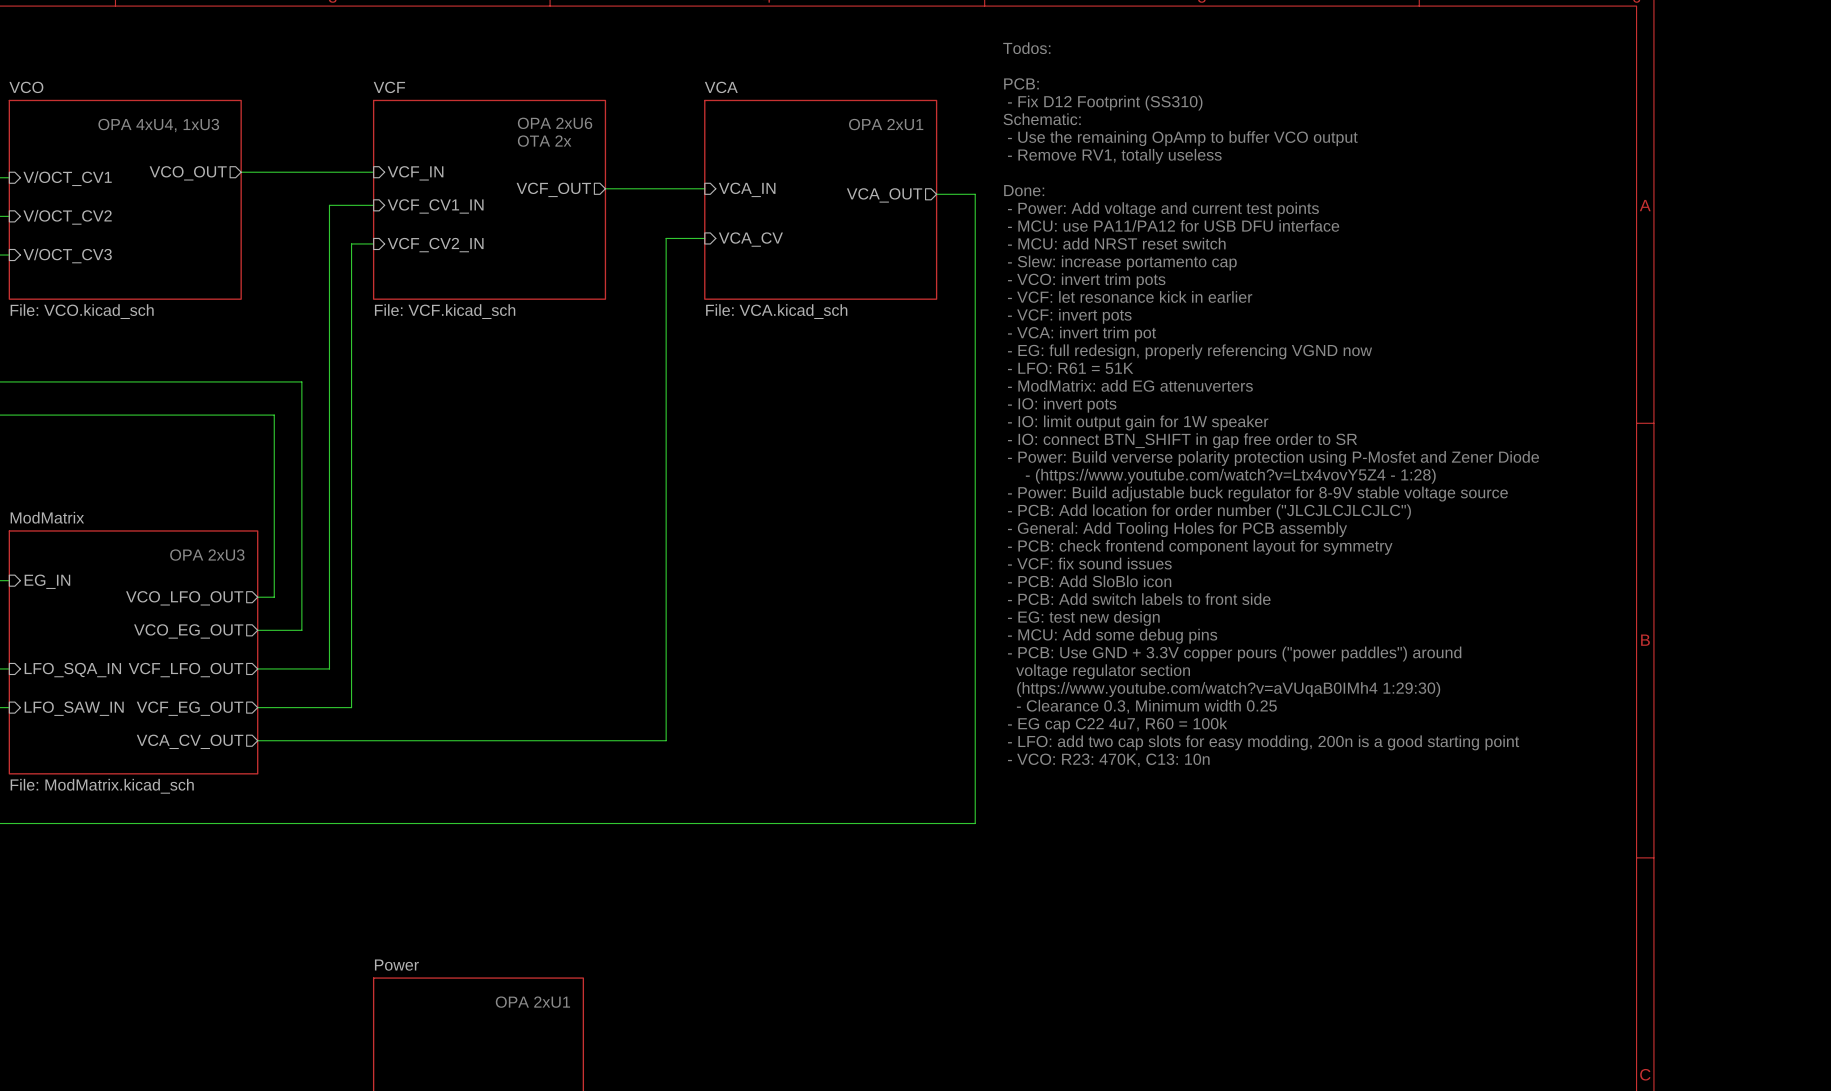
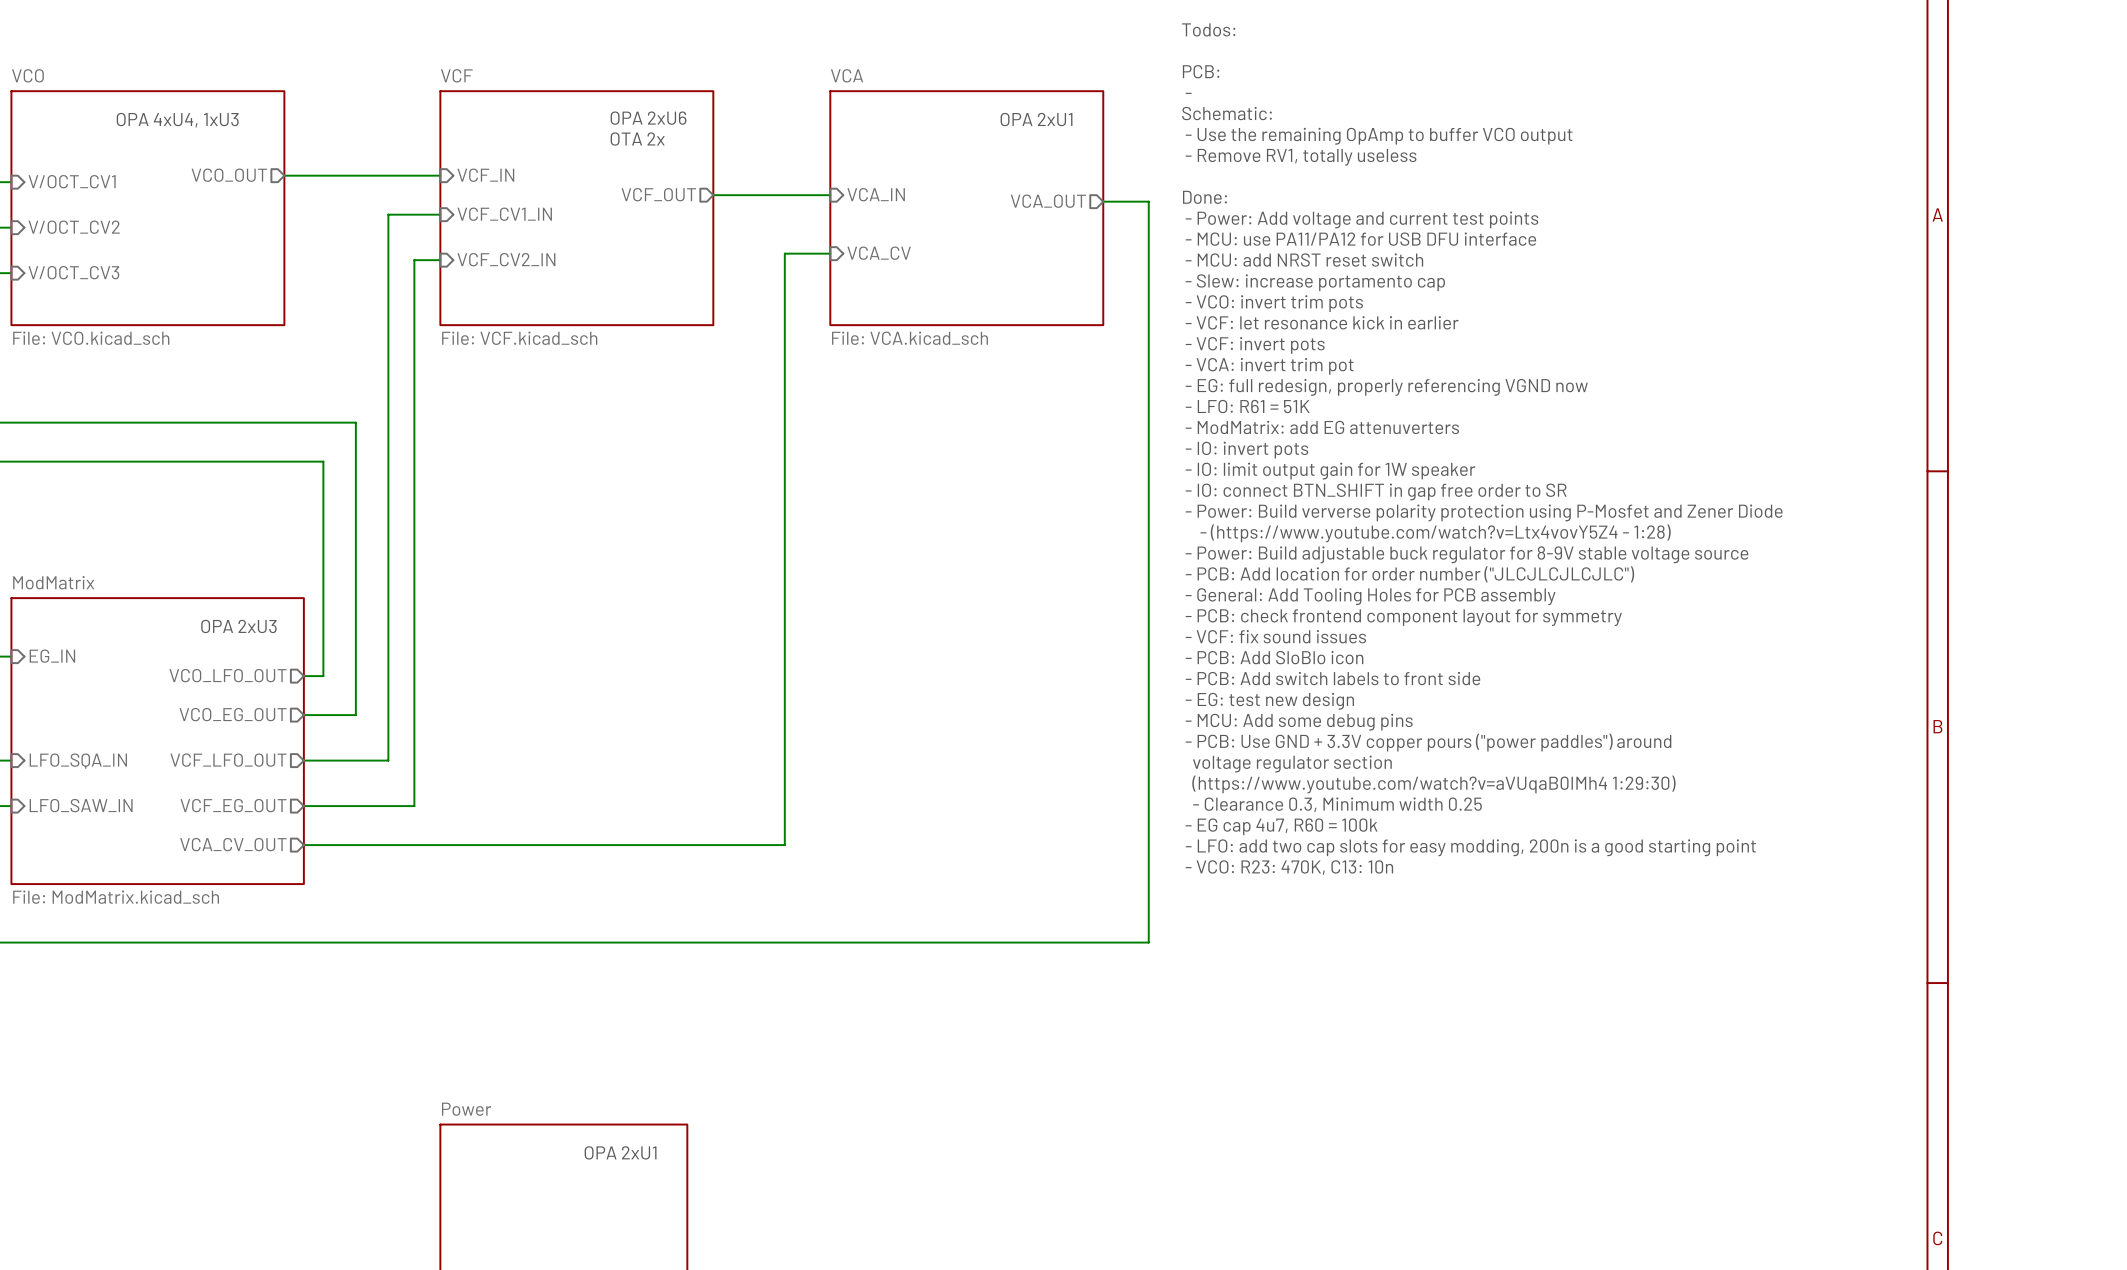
text: - Fix D12 Footprint (SS310) (1105, 103) -> - (1188, 93)
text: - EG cap C22 4u7, R60 = 100k (1117, 725) -> - EG cap 4u7, R60 = 100k (1281, 826)

